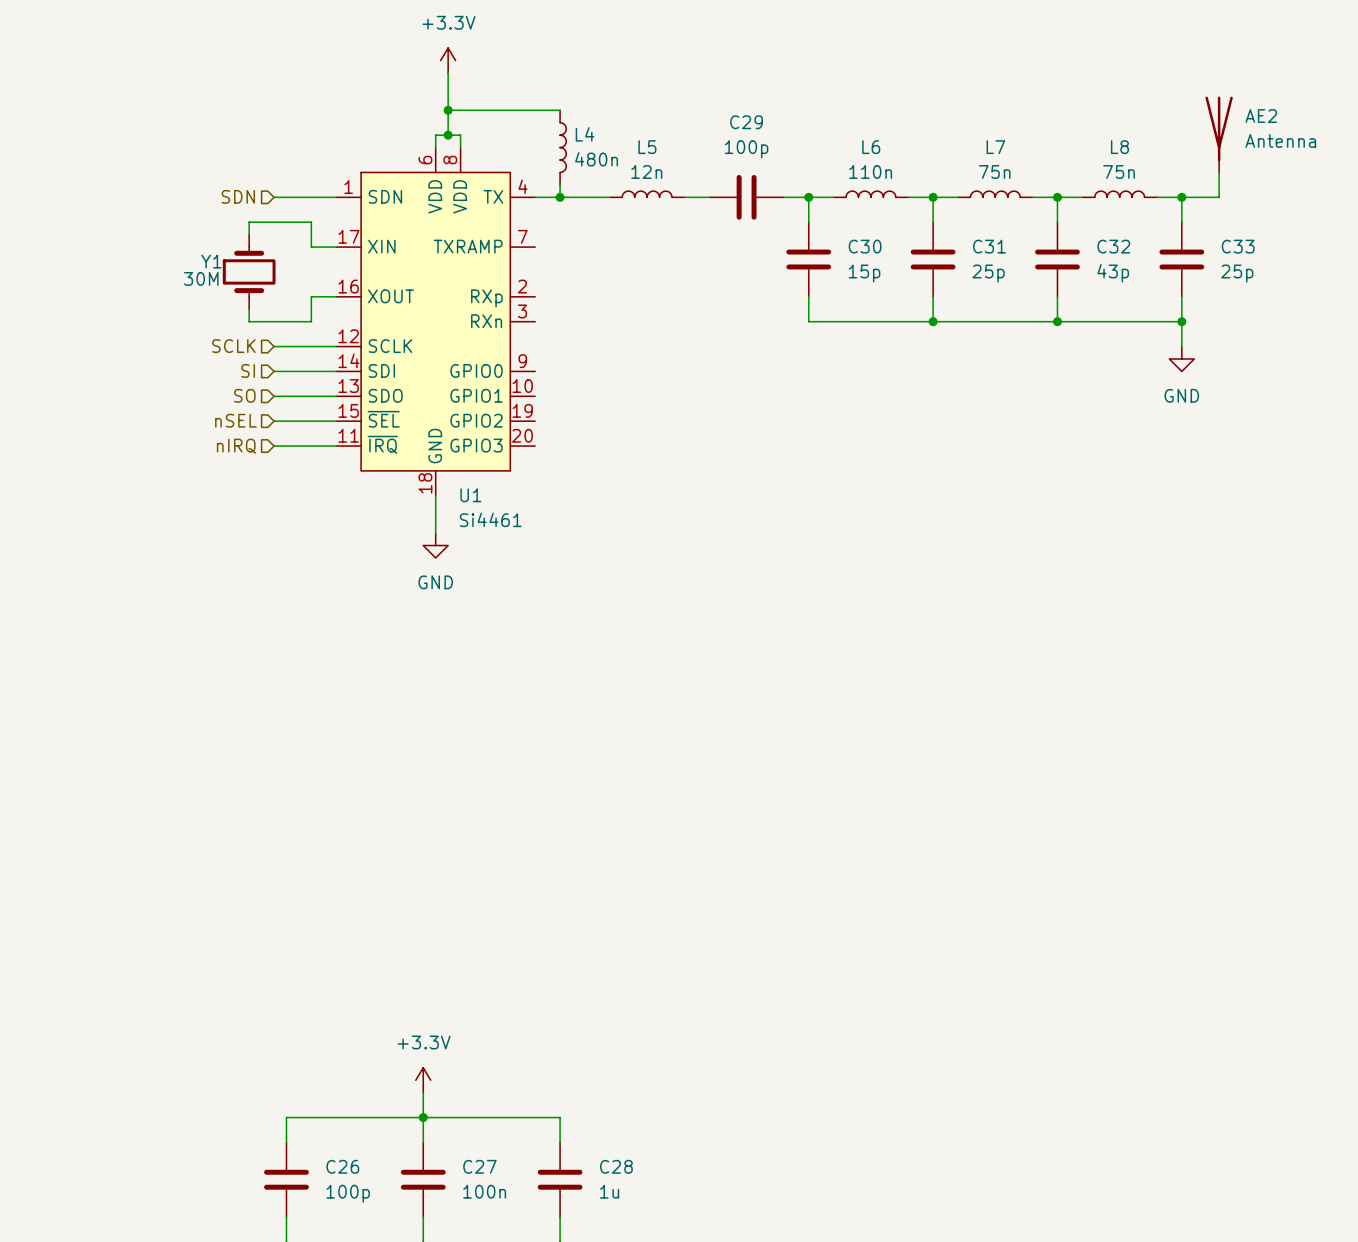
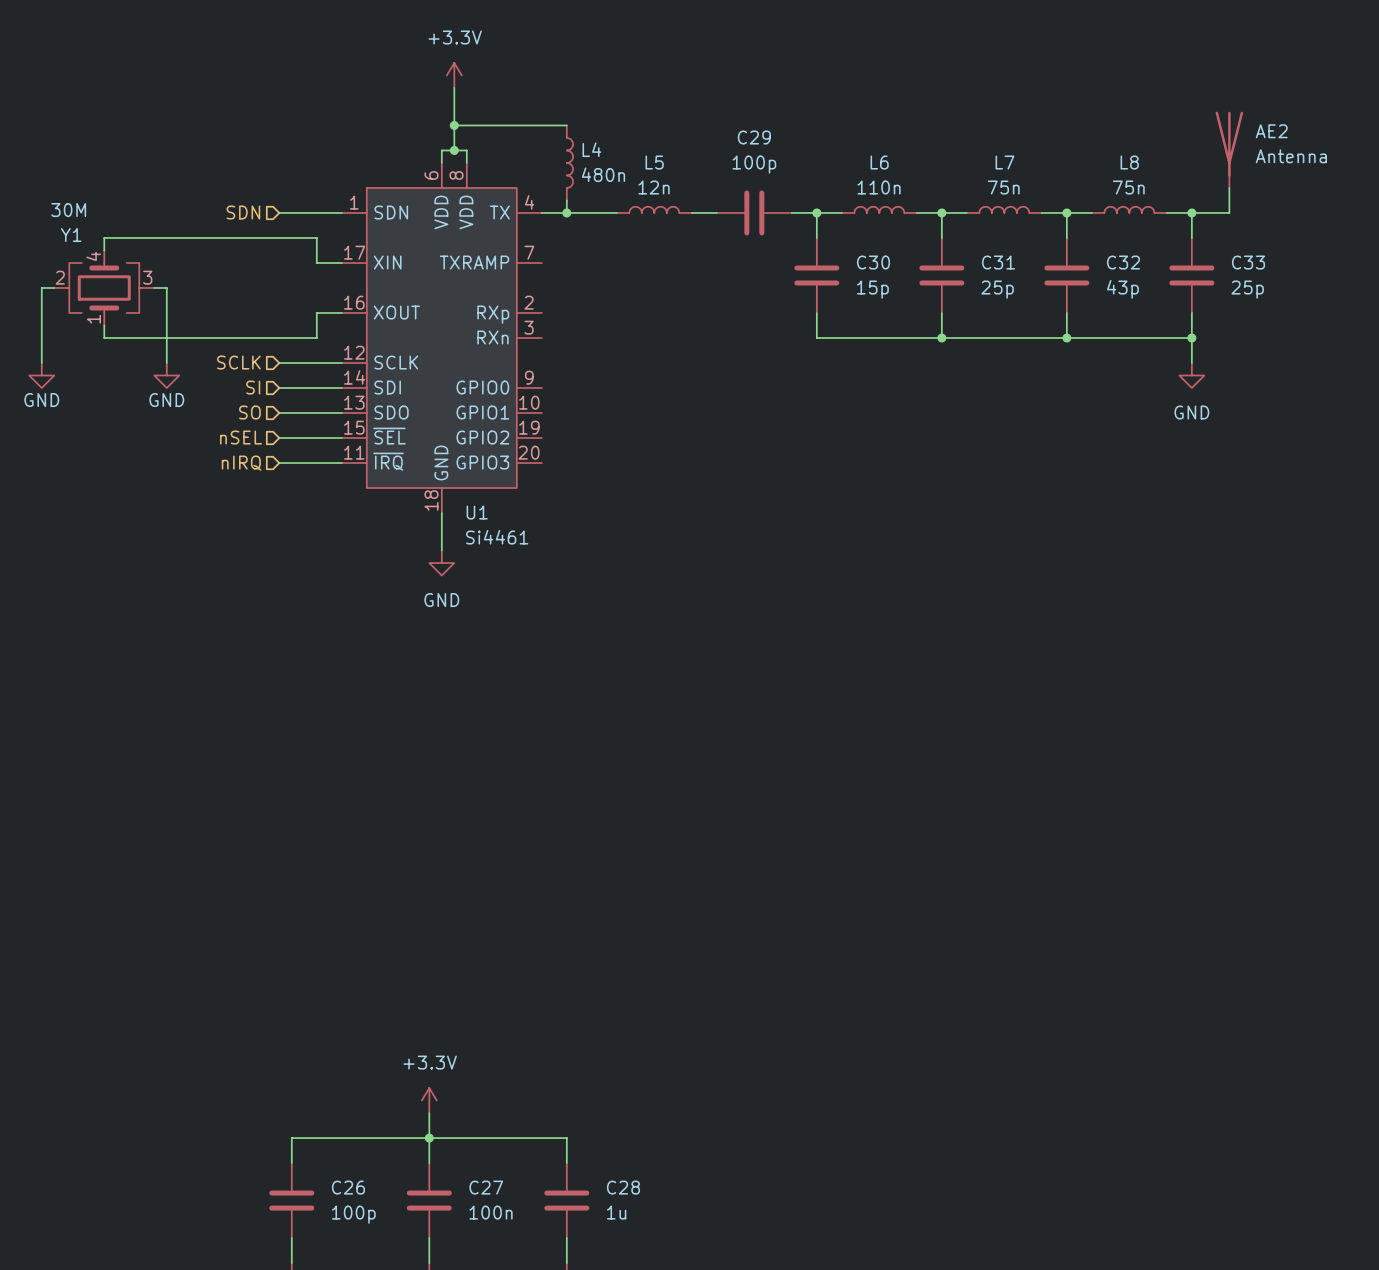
wire: (249, 222) (249, 234) -> (254, 237) (104, 237) (104, 250)
Y1 symbol: [222, 234, 276, 310] -> [54, 250, 155, 326]
Y1 name position: Y1 (211, 261) -> Y1 (71, 235)
wire: none -> (54, 287) (41, 287) (41, 363)
wire: none -> (154, 287) (166, 287) (166, 363)
Y1 value position: 30M (201, 278) -> 30M (68, 210)
wire: (249, 309) (249, 321) -> (104, 325) (104, 337) (254, 337)
power symbol: none -> GND (41, 375)
power symbol: none -> GND (166, 375)

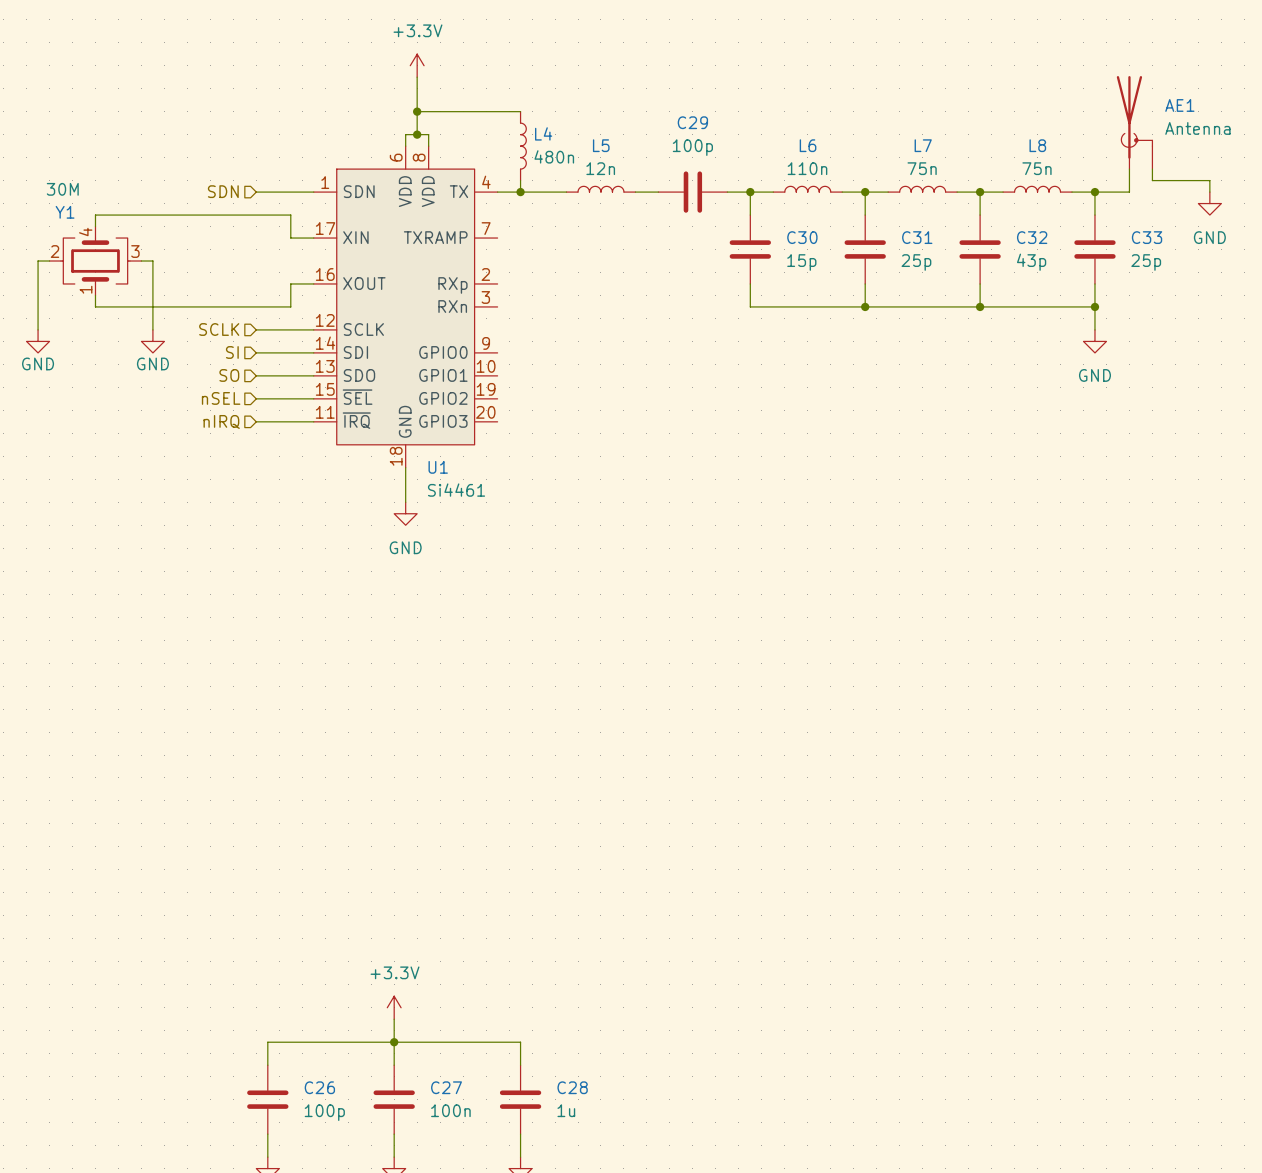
AE1: none -> Antenna (1134, 122)
AE2: Antenna (1229, 149) -> none
wire: none -> (1152, 169) (1152, 180) (1209, 180) (1209, 192)
power symbol: none -> GND (1209, 203)

